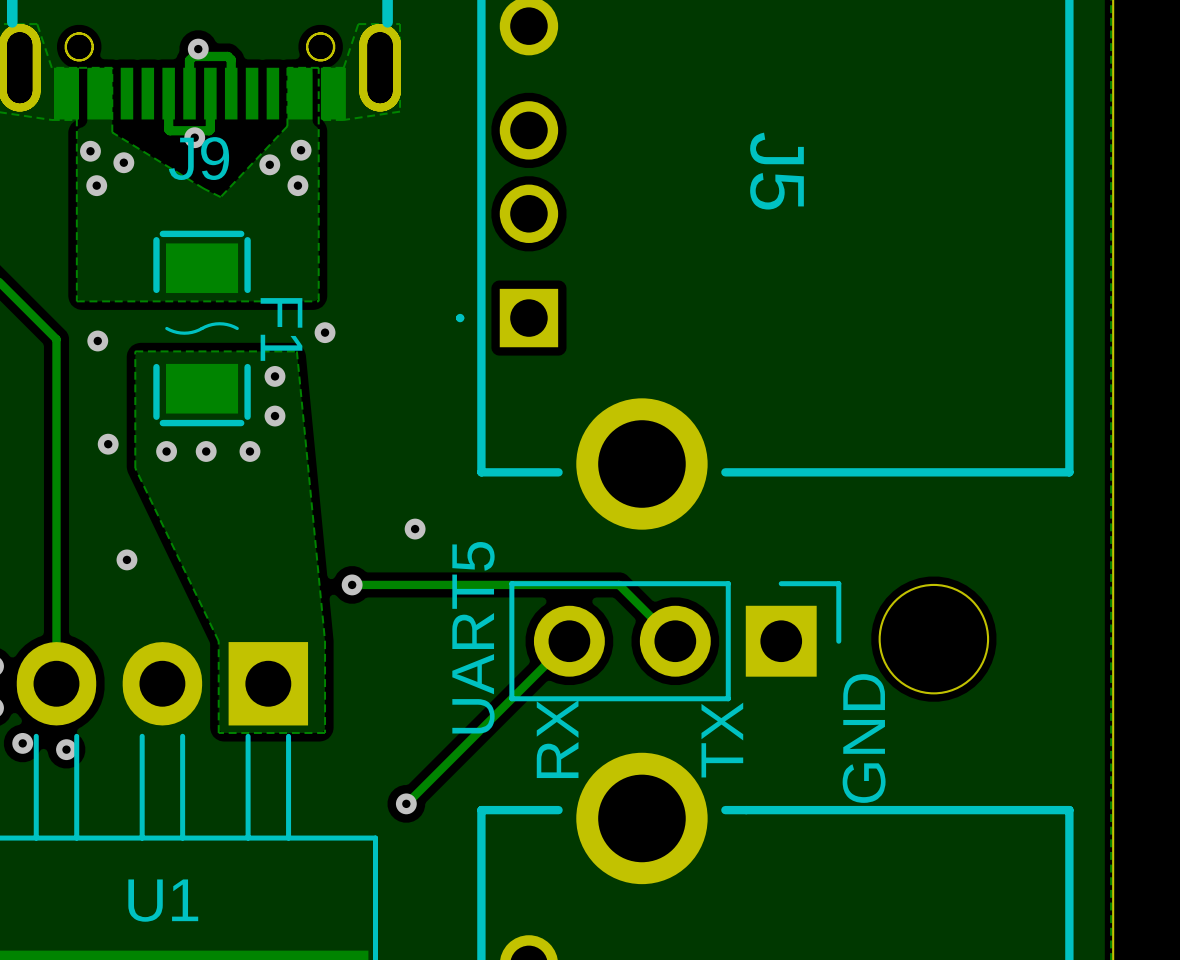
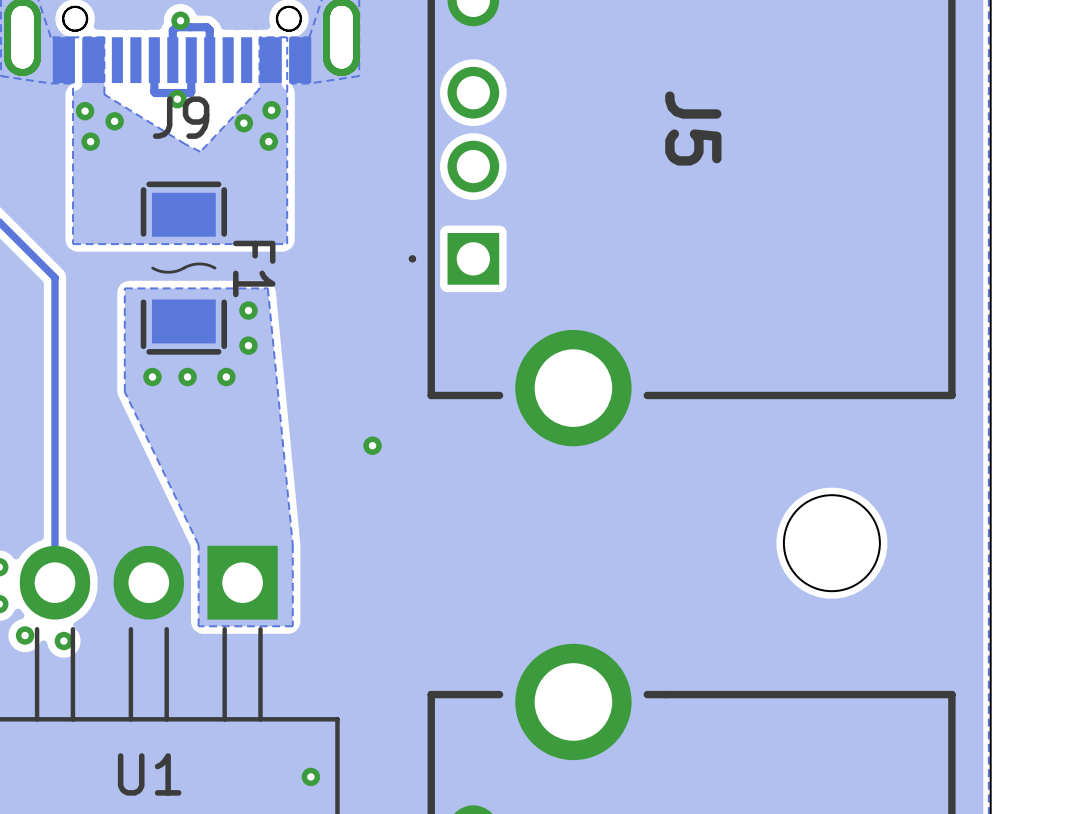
via: (325, 332) -> none
via: (97, 340) -> none
via: (108, 444) -> none
via: (126, 559) -> none
track: (352, 584) (619, 584) (675, 641) -> none
via: (352, 584) -> none
text: UART5 (473, 637) -> none
track: (569, 641) (406, 803) -> none
part: (675, 641) -> none
text: GND (864, 738) -> none
text: RX (557, 739) -> none
text: TX (722, 740) -> none
via position: (406, 803) -> (310, 776)

